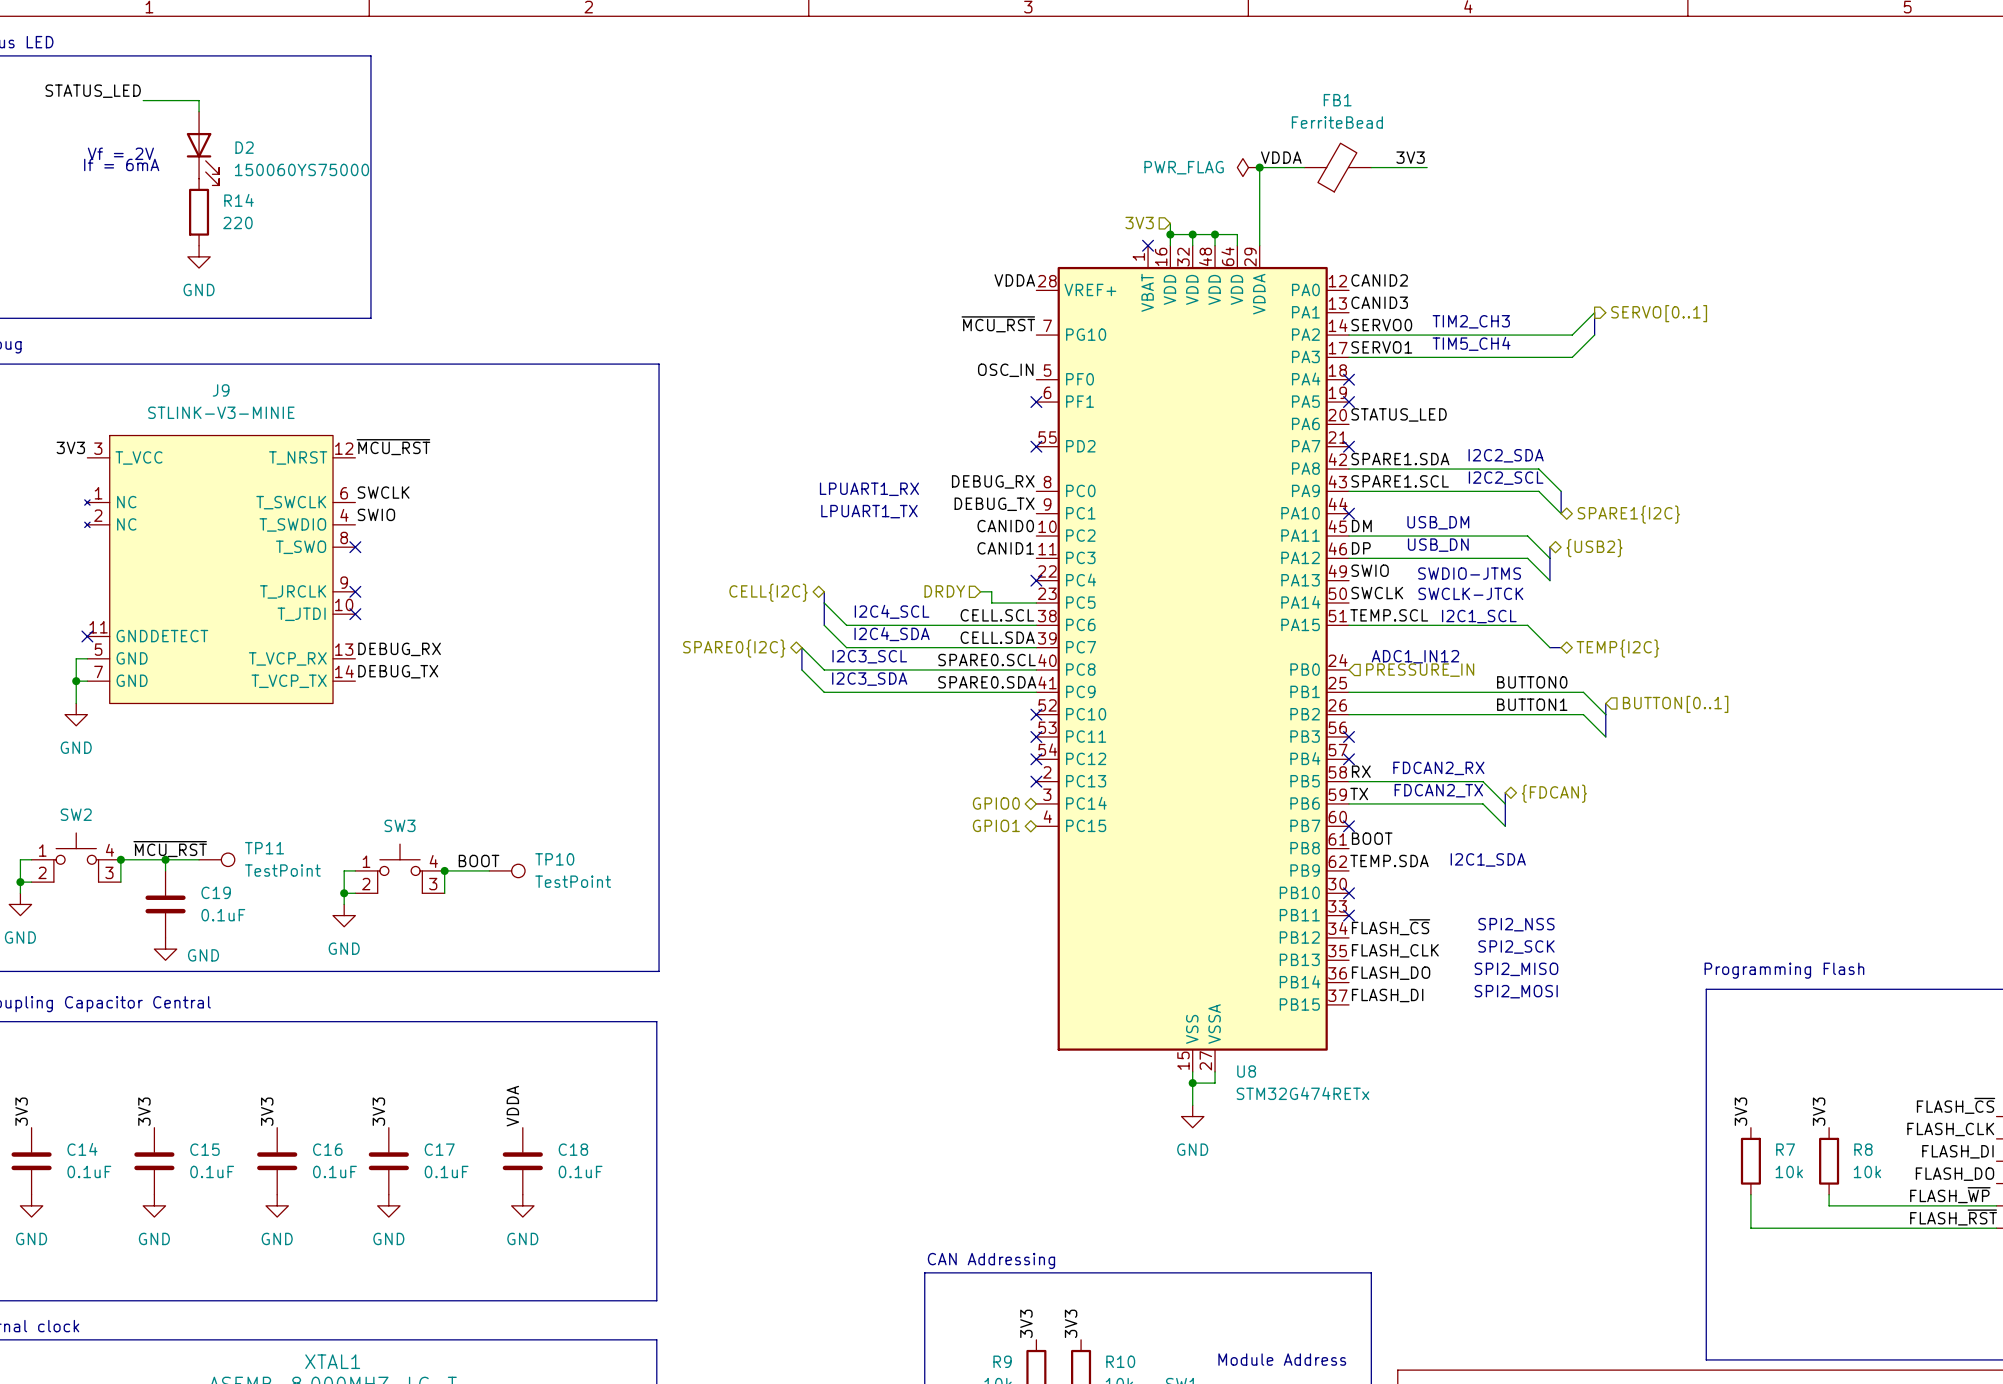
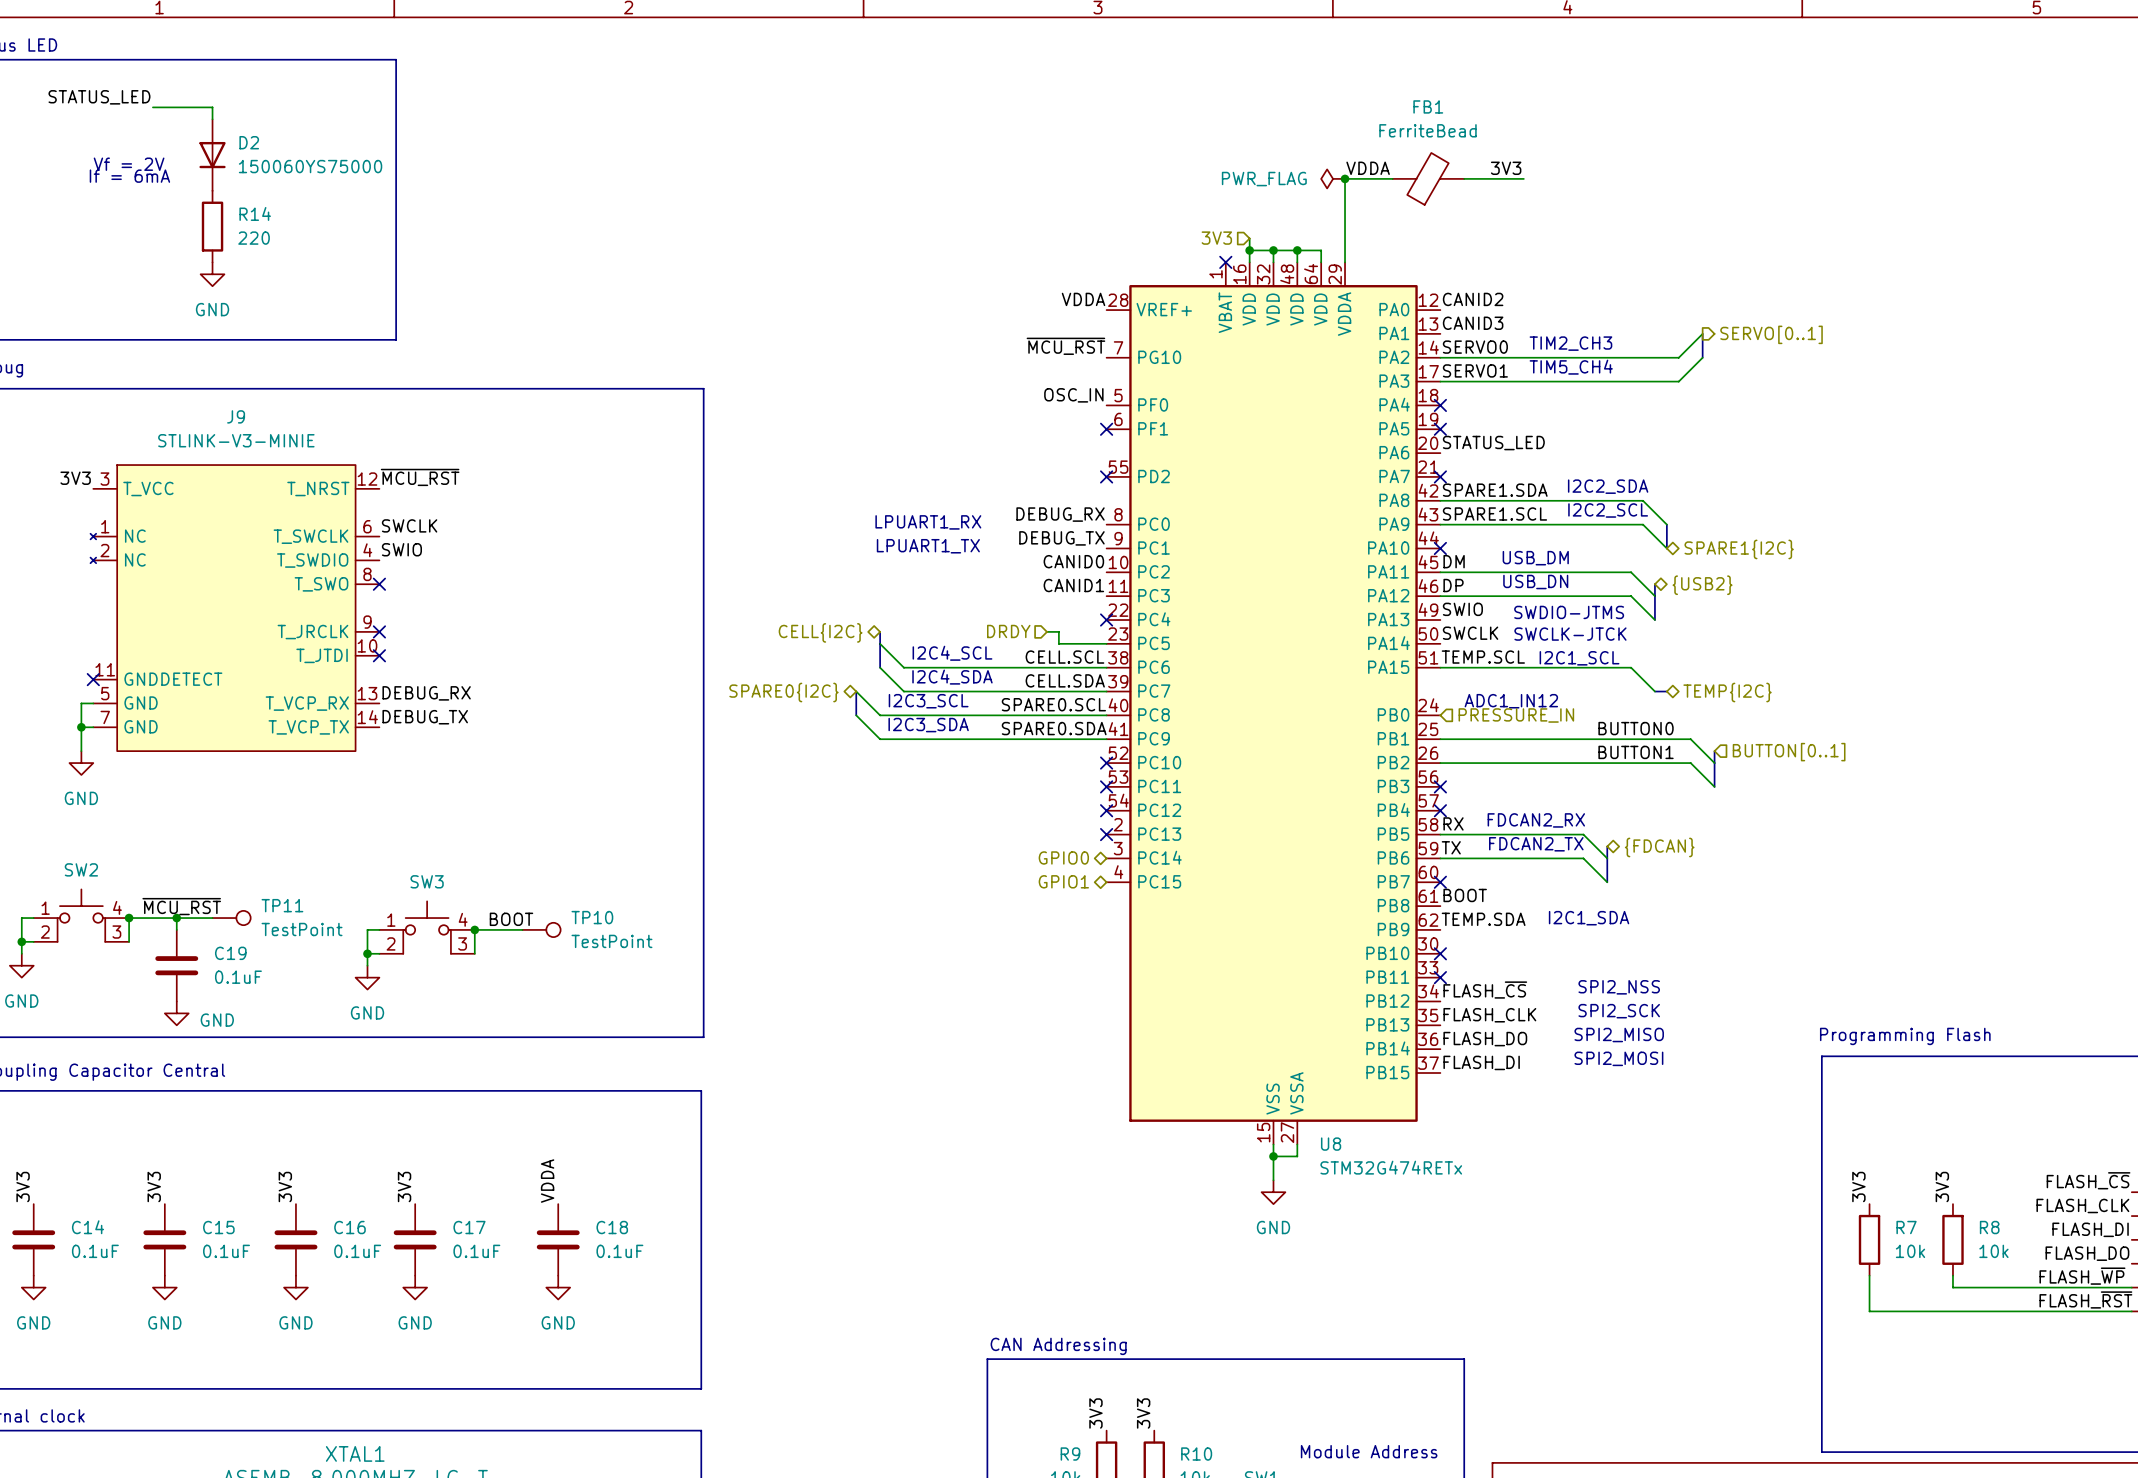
D2 symbol: [186, 111, 220, 186] -> [199, 119, 226, 191]

